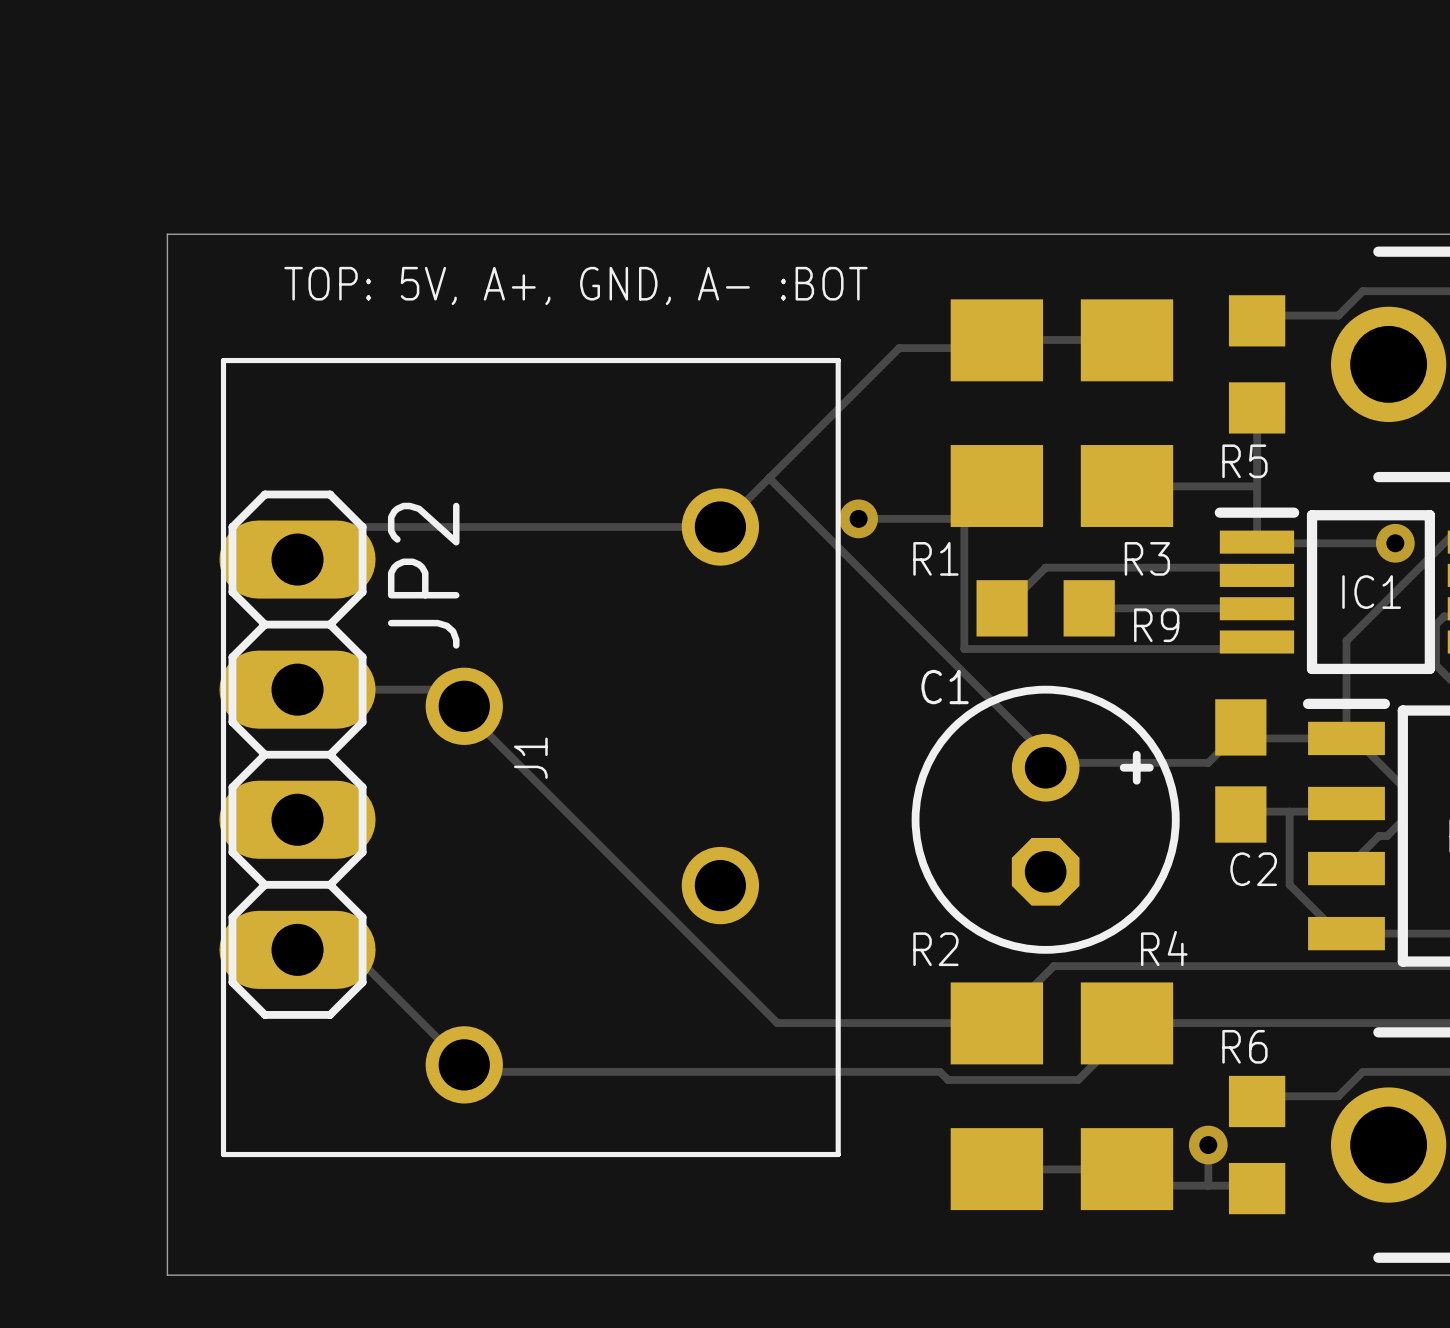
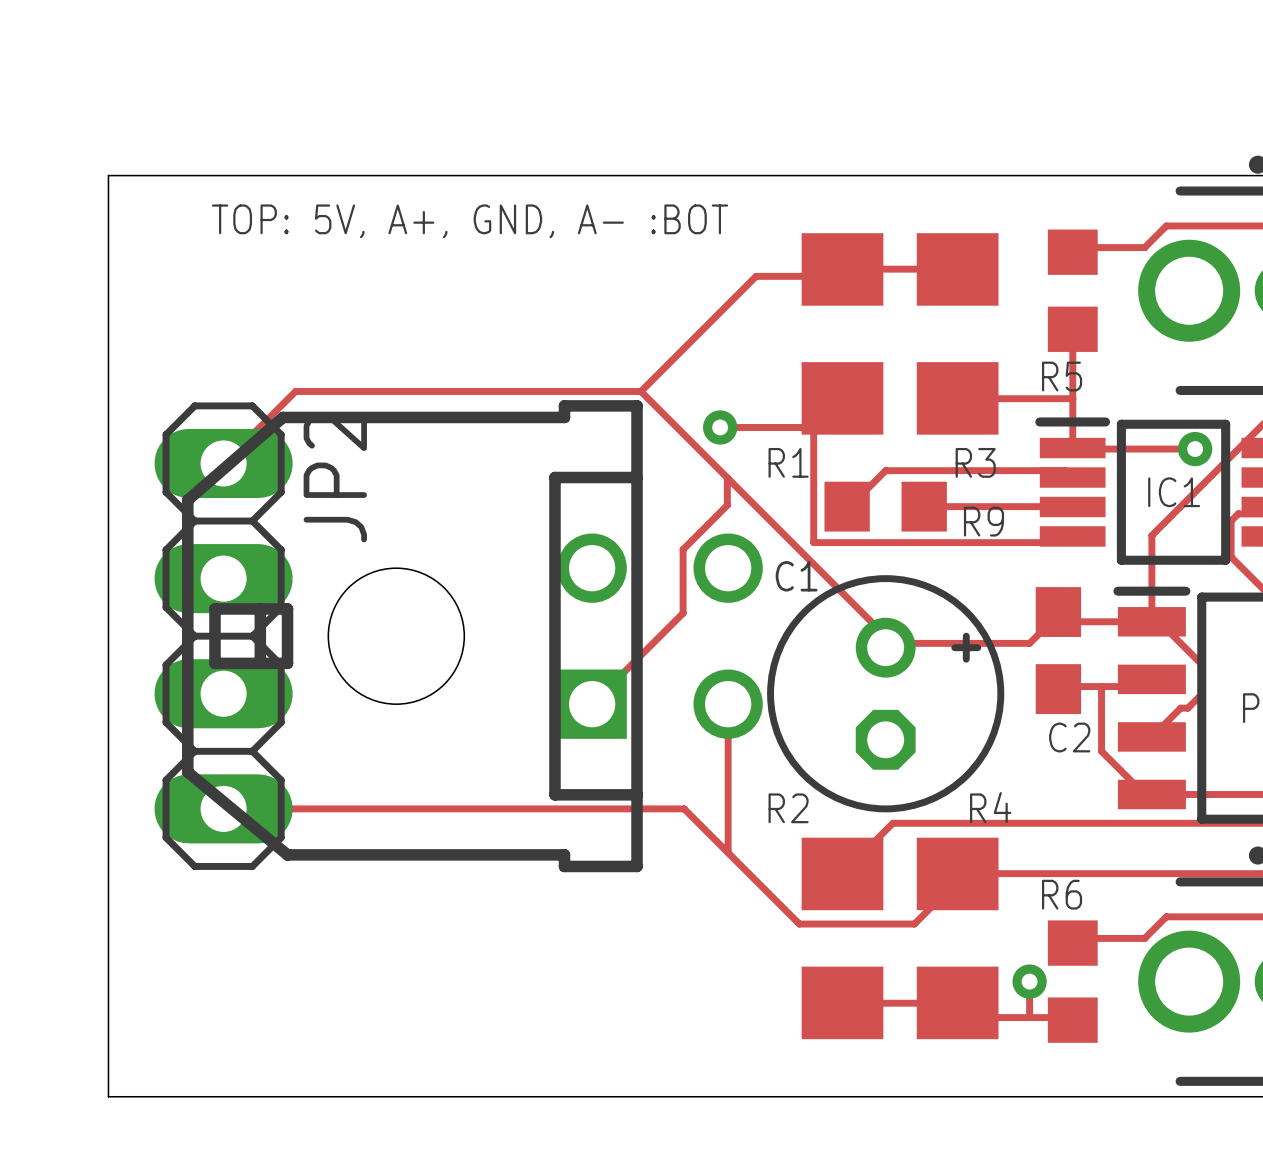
track: (769, 478) (720, 527) (330, 527) -> (640, 391) (295, 391) (252, 434)
track: none -> (727, 477) (727, 505) (683, 549) (683, 613) (592, 704)
track: (297, 689) (447, 689) (464, 706) (468, 714) (777, 1023) (996, 1023) -> none
part: none -> (472, 636)
J1: (530, 757) -> none
track: none -> (728, 704) (728, 852)
track: (349, 949) (464, 1064) (468, 1071) (939, 1071) -> (269, 808) (684, 808) (792, 916)

